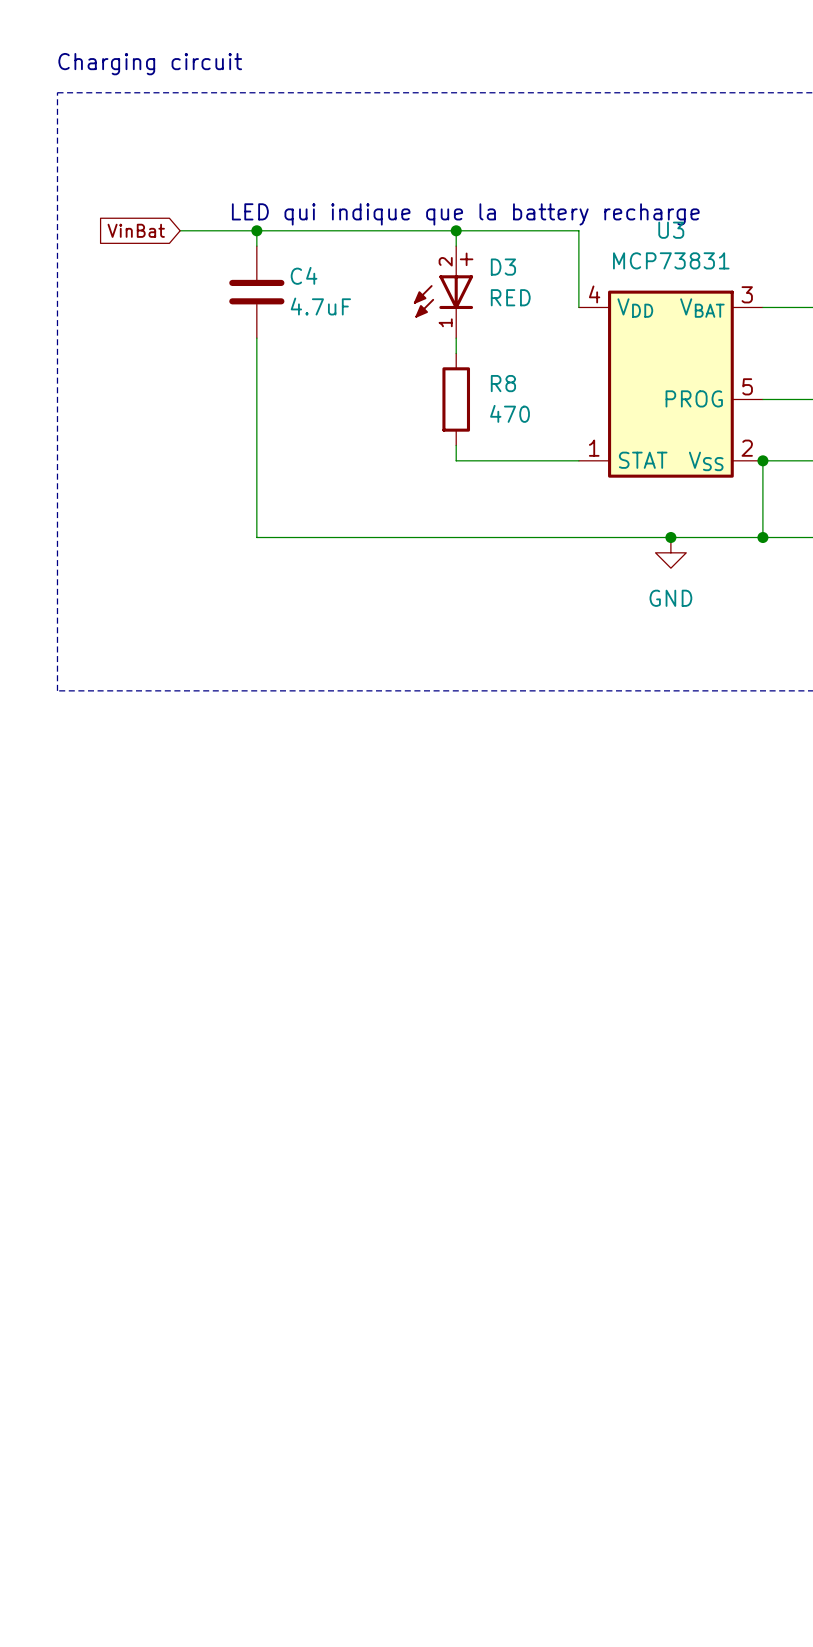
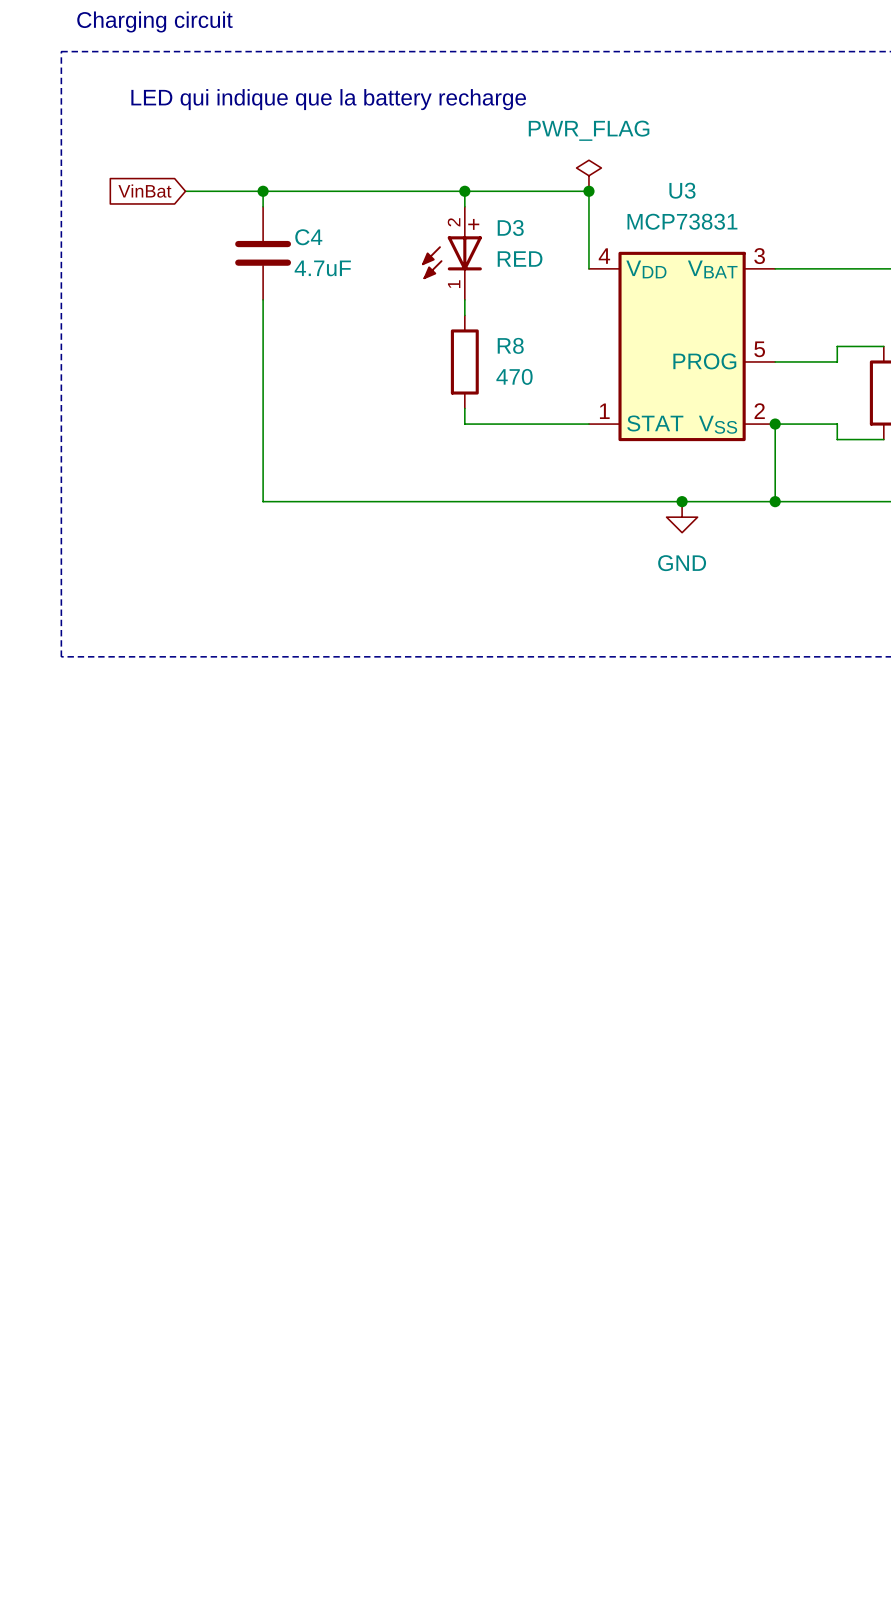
text position: LED qui indique que la battery recharge (465, 214) -> LED qui indique que la battery recharge (328, 99)
power symbol: none -> PWR_FLAG (588, 175)
junction: none -> (588, 191)

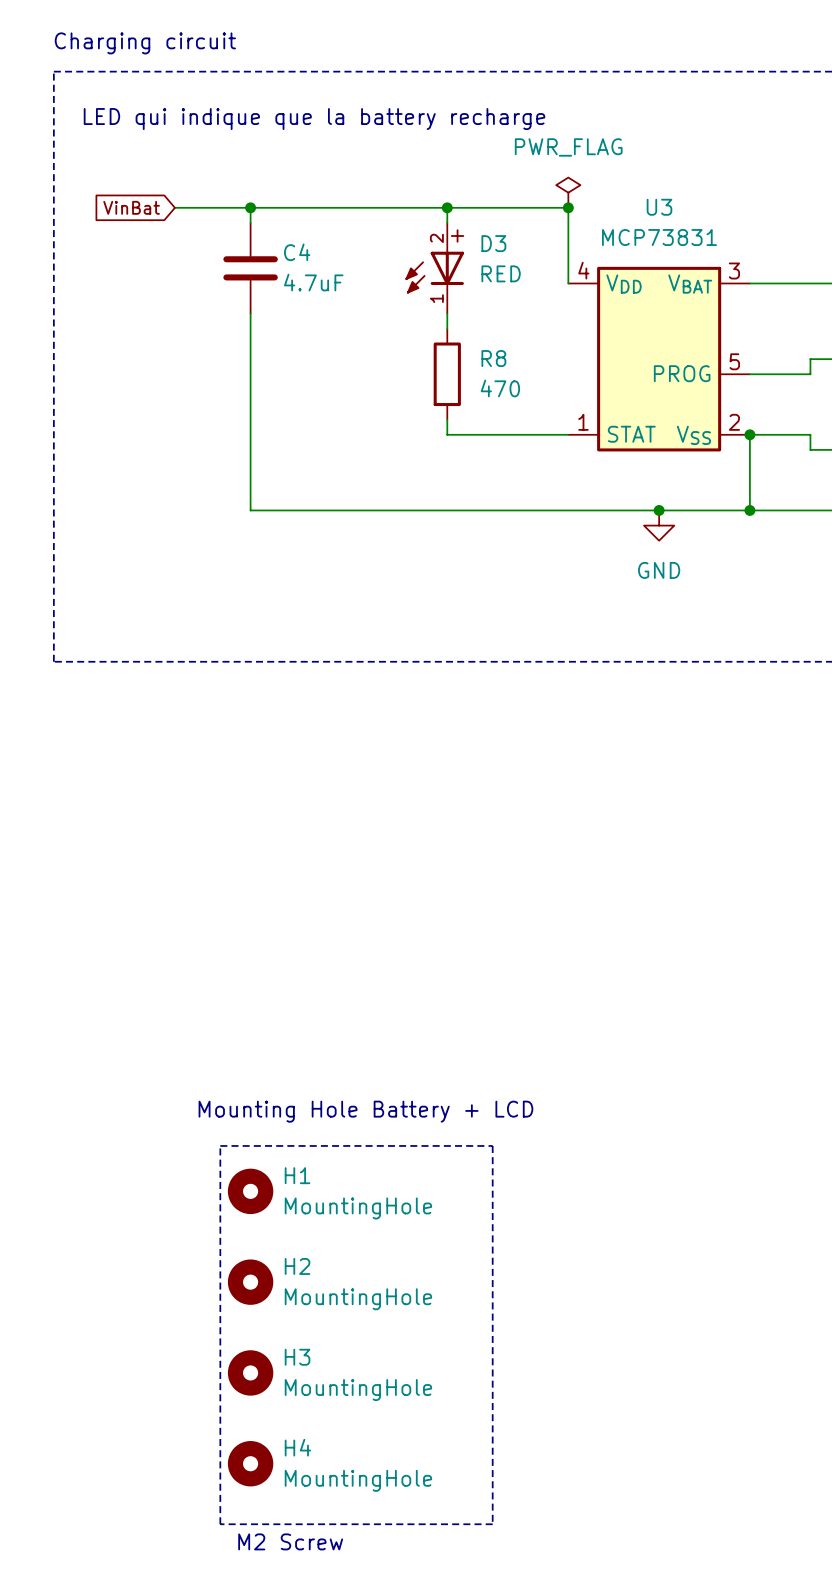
text: none -> Mounting Hole Battery + LCD (365, 1111)
line: none -> (220, 1145) (492, 1145) (492, 1524) (220, 1524) (220, 1145)
H1: none -> MountingHole (250, 1191)
H2: none -> MountingHole (250, 1282)
H3: none -> MountingHole (250, 1372)
H4: none -> MountingHole (250, 1463)
text: none -> M2 Screw (290, 1541)

